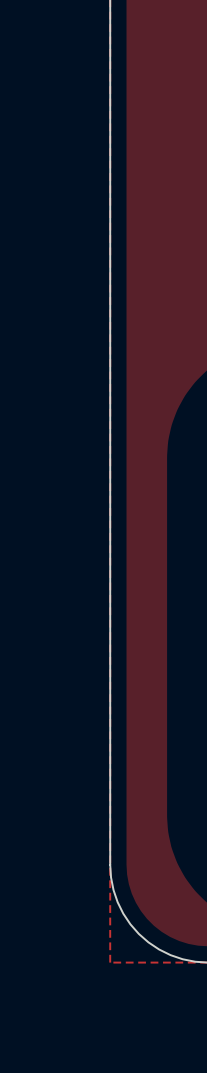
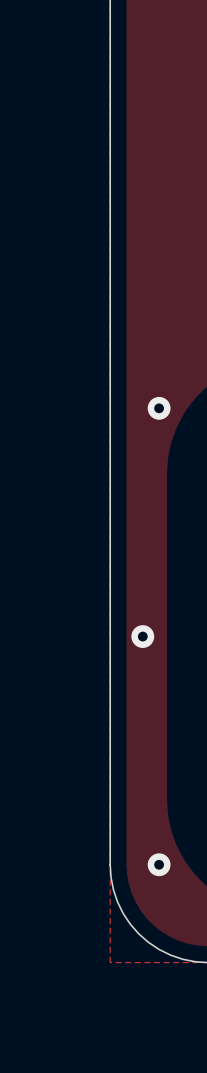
via: none -> (159, 408)
via: none -> (142, 636)
via: none -> (159, 864)

